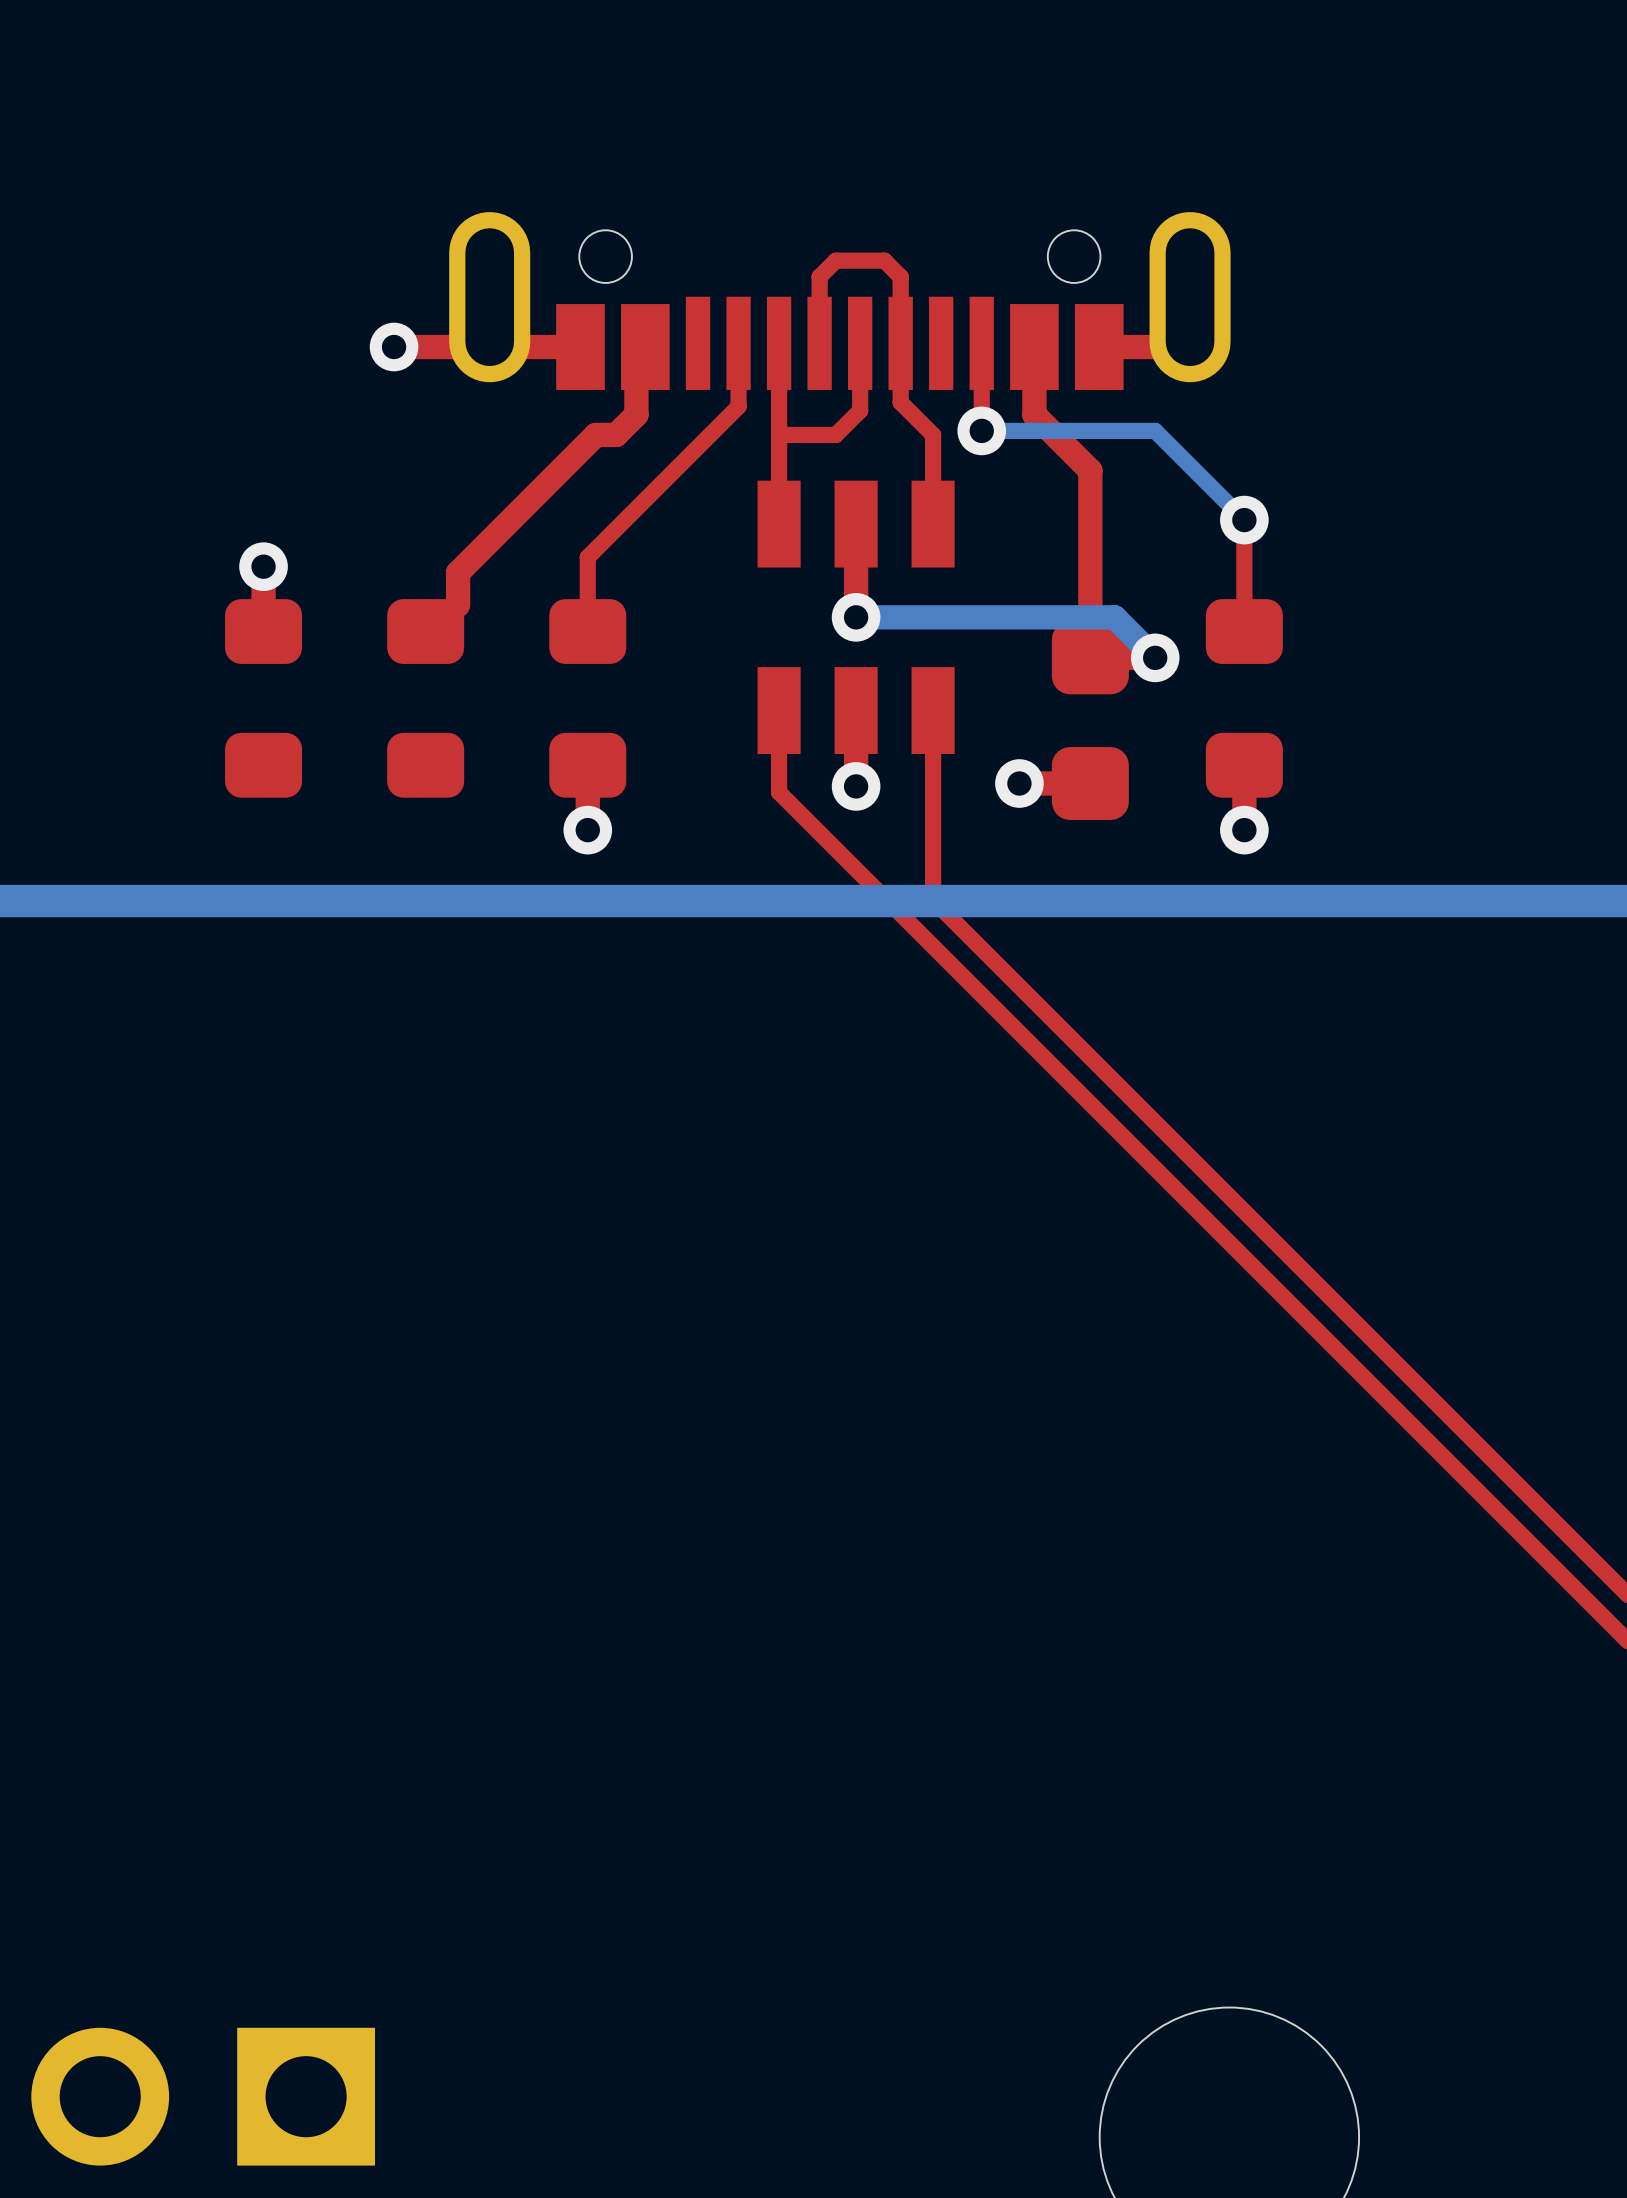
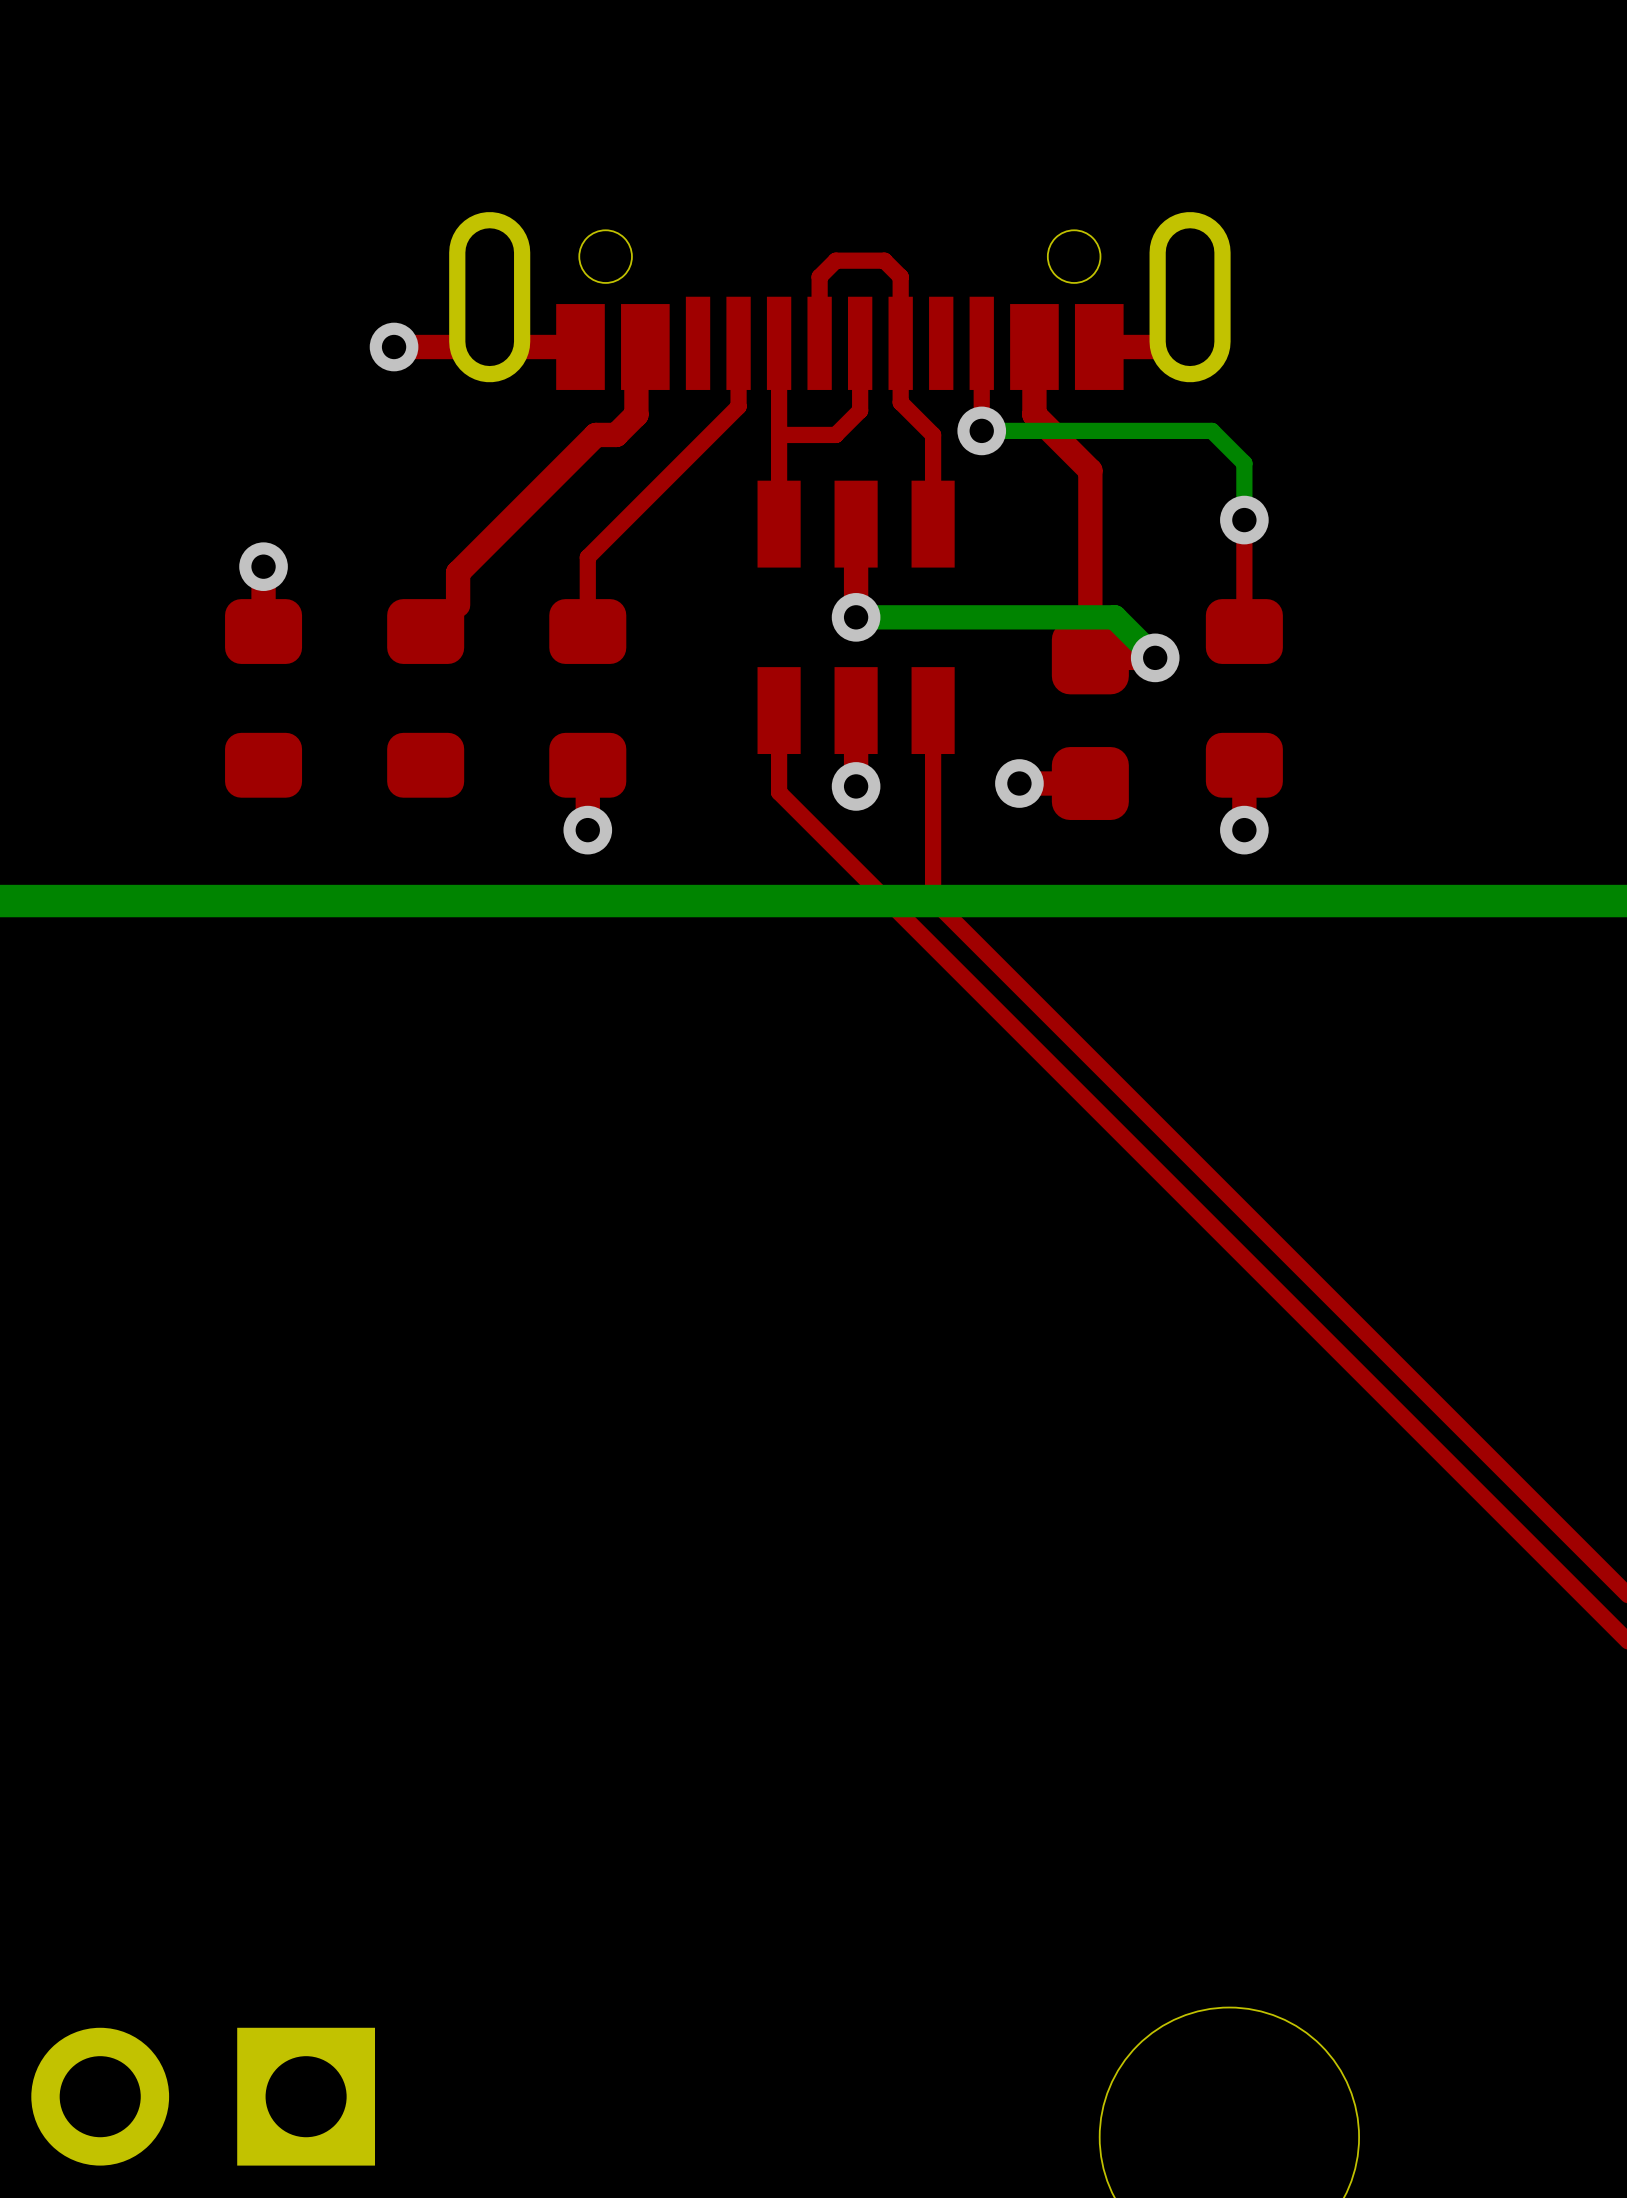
bottom track: (1155, 430) (1244, 520) -> (1155, 430) (1211, 430) (1244, 463) (1244, 520)

